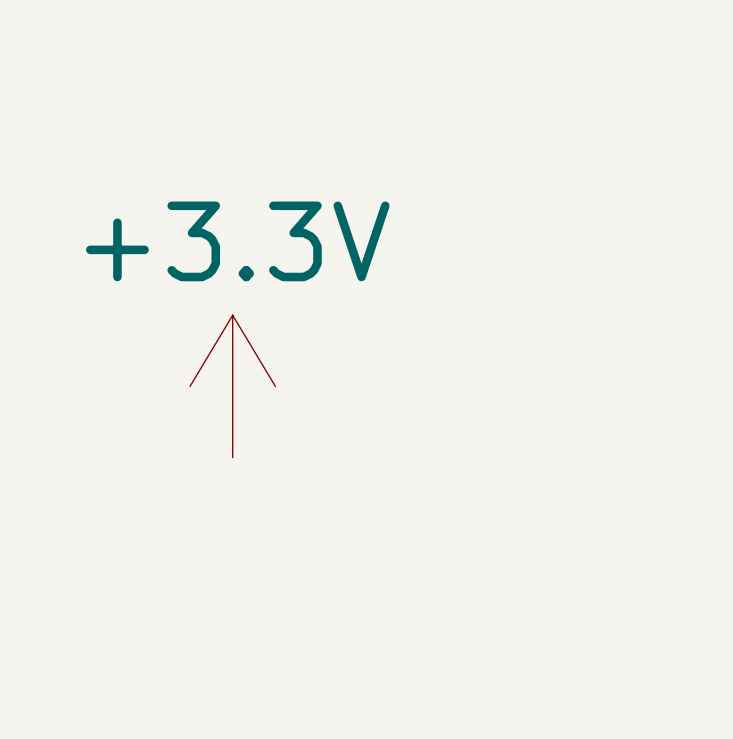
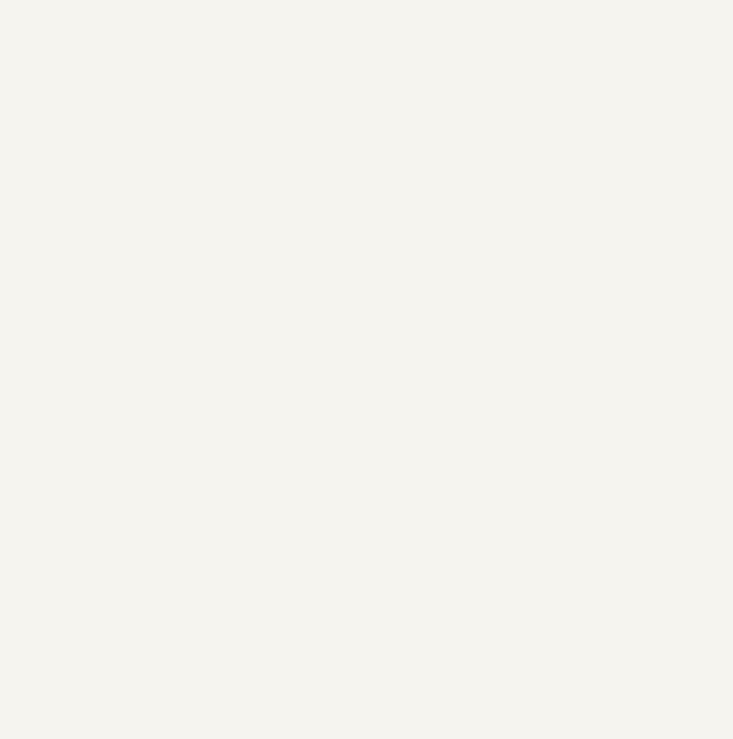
power symbol: +3.3V (232, 386) -> none

